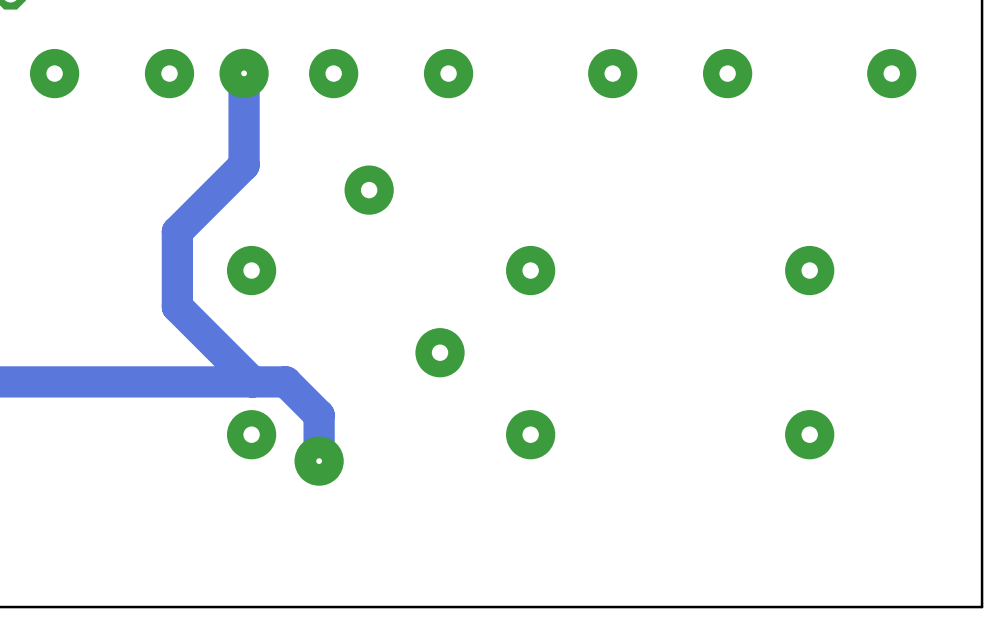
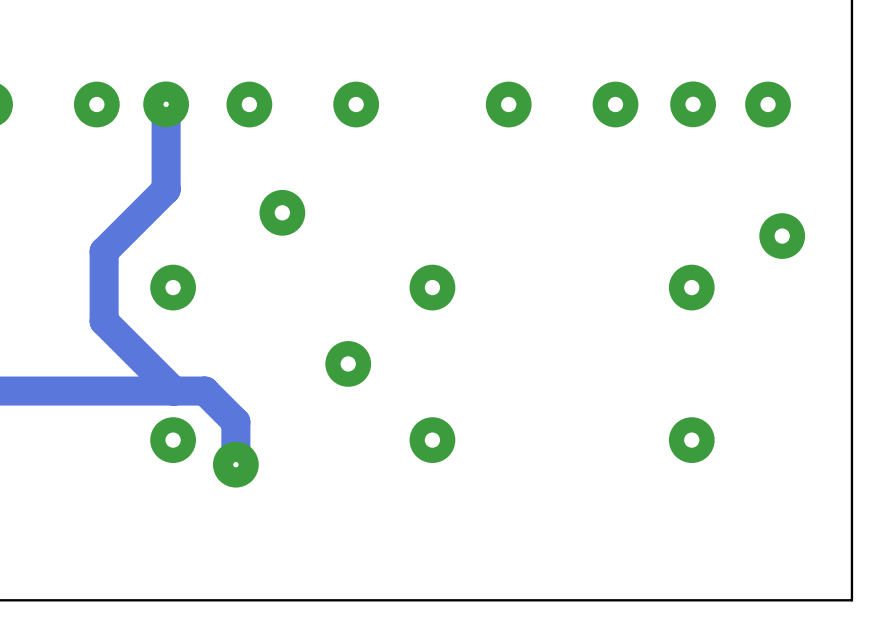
via: none -> (693, 104)
via: none -> (782, 236)

